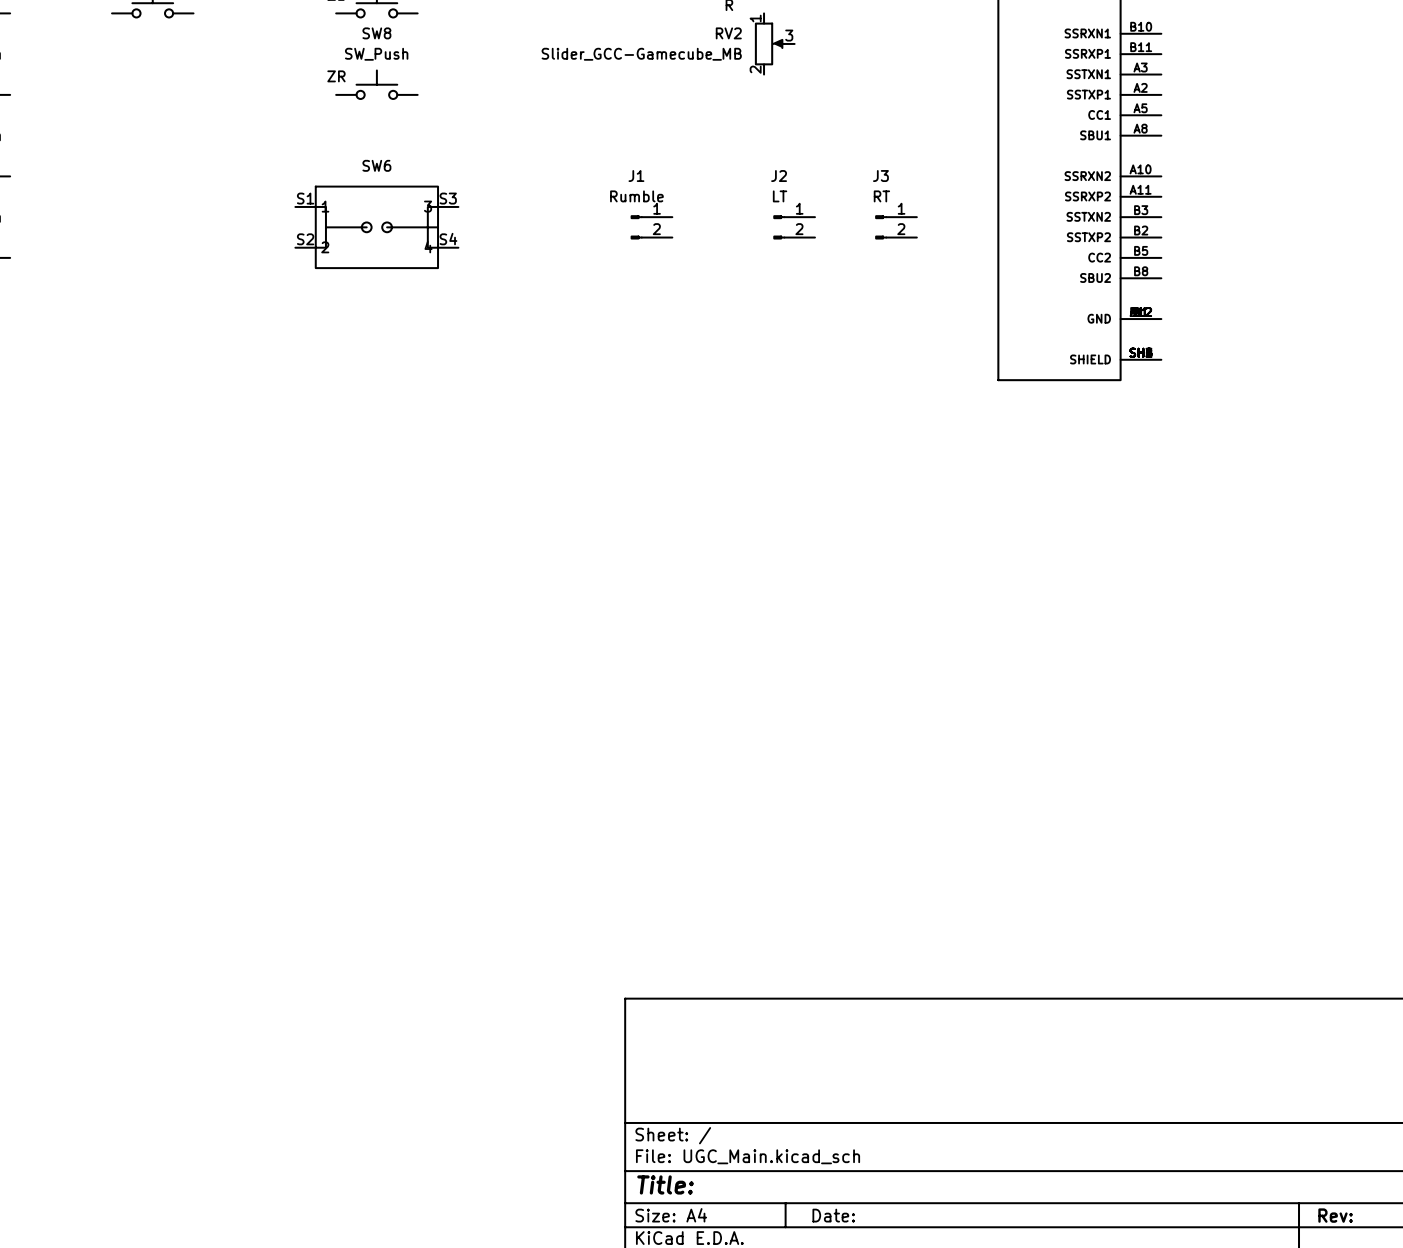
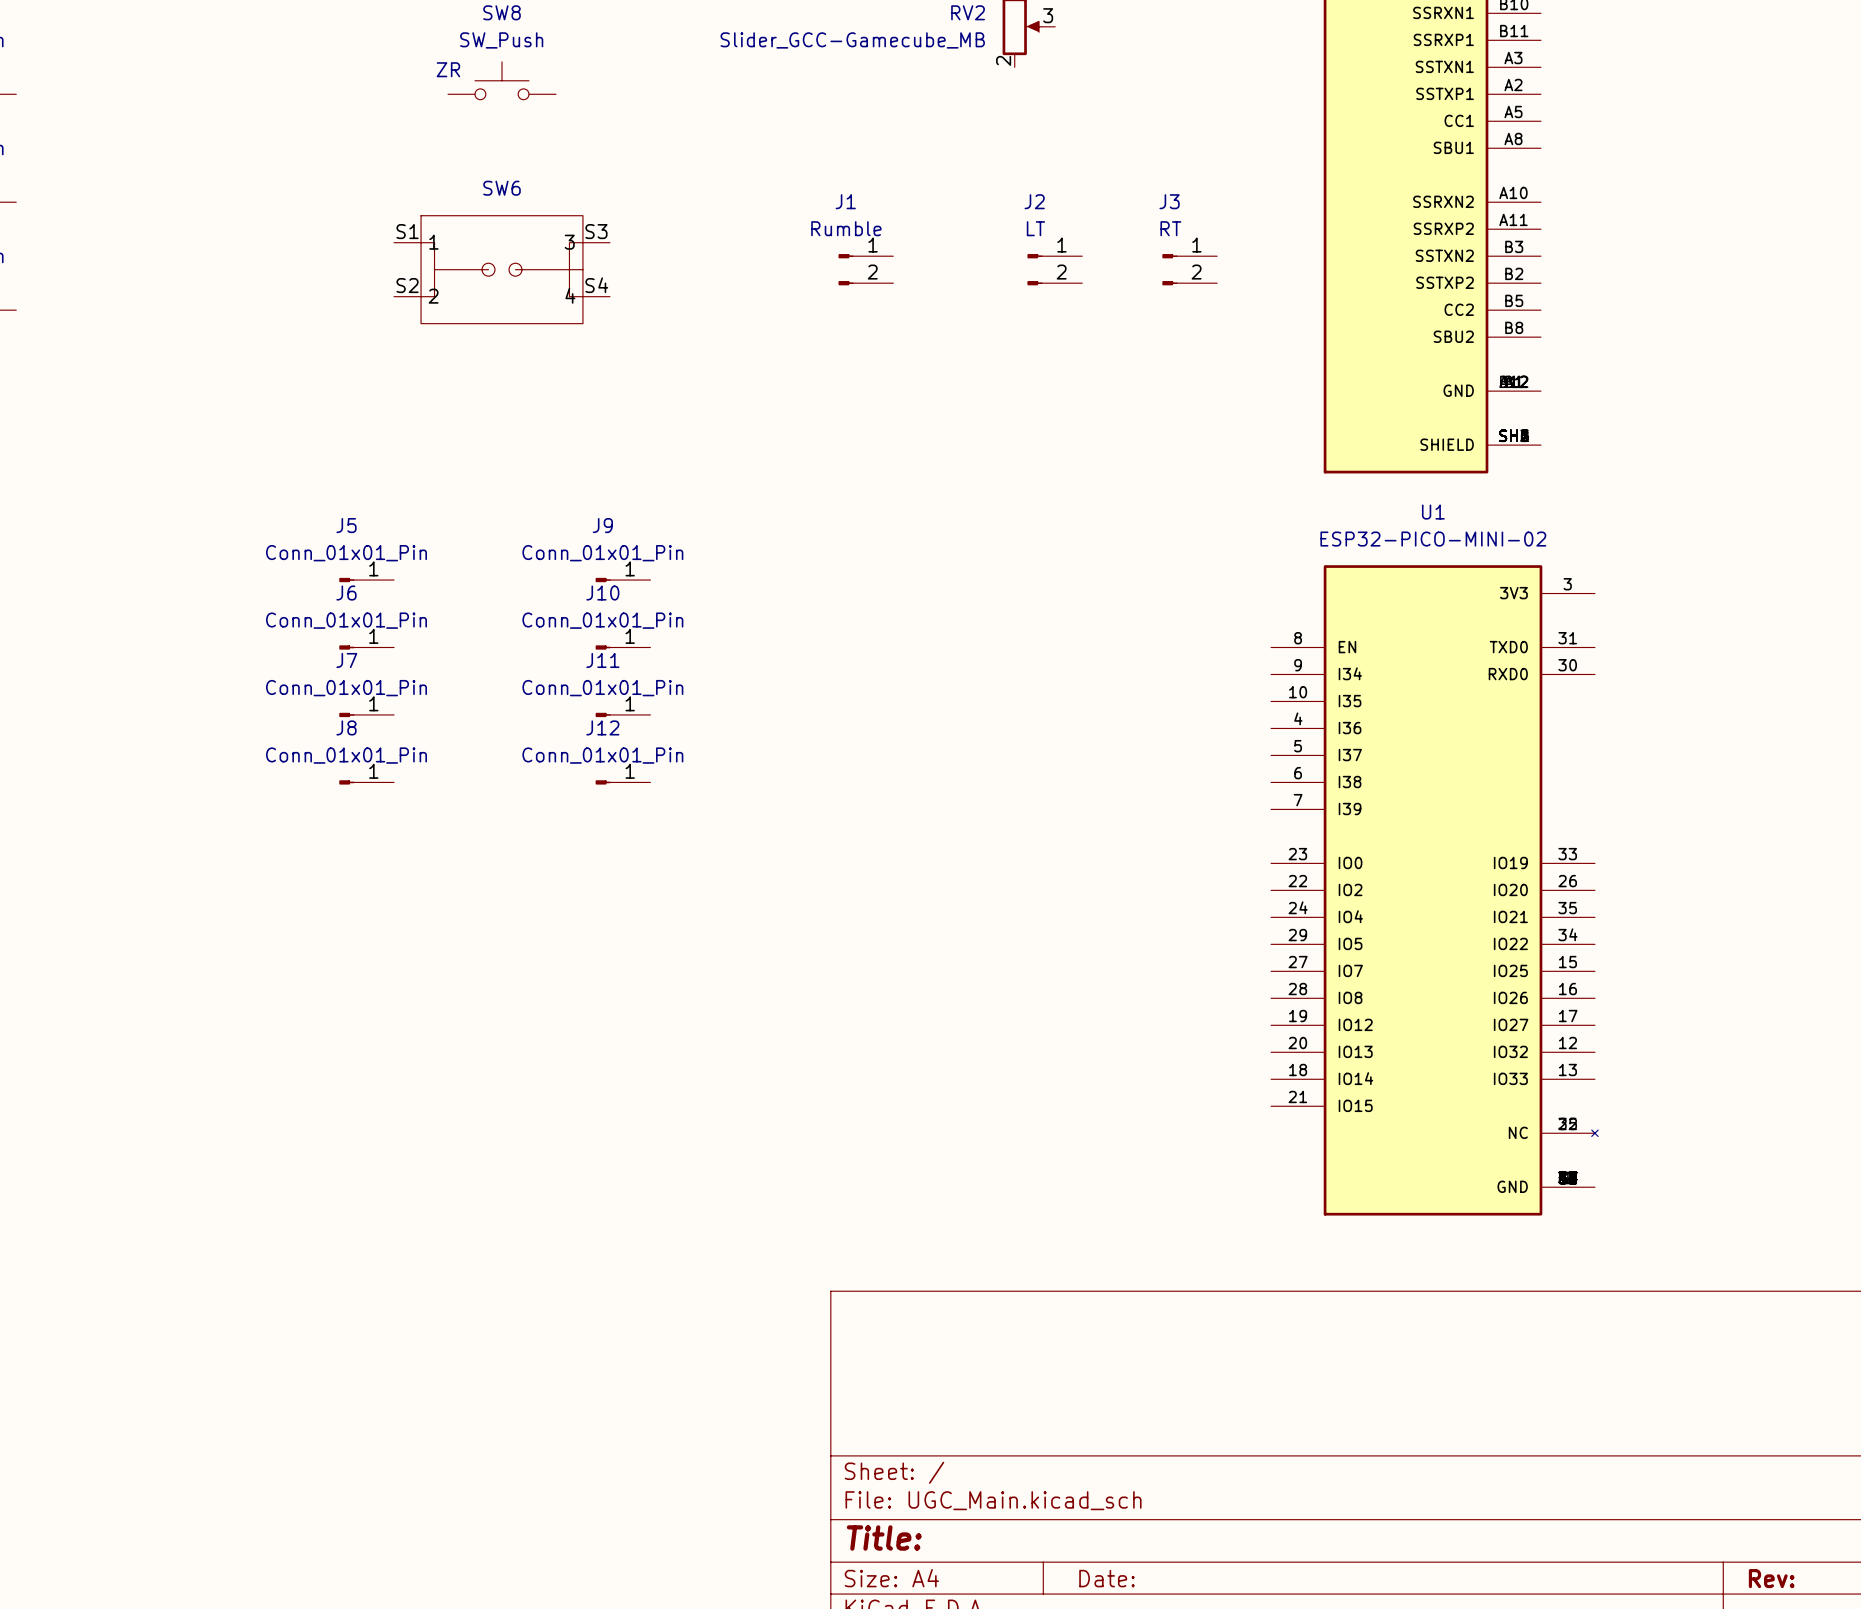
J5: none -> Conn_01x01_Pin (366, 580)
J9: none -> Conn_01x01_Pin (623, 580)
J6: none -> Conn_01x01_Pin (366, 647)
J10: none -> Conn_01x01_Pin (623, 647)
J7: none -> Conn_01x01_Pin (366, 714)
J11: none -> Conn_01x01_Pin (623, 714)
J8: none -> Conn_01x01_Pin (366, 782)
J12: none -> Conn_01x01_Pin (623, 782)
U1: none -> ESP32-PICO-MINI-02 (1434, 890)

